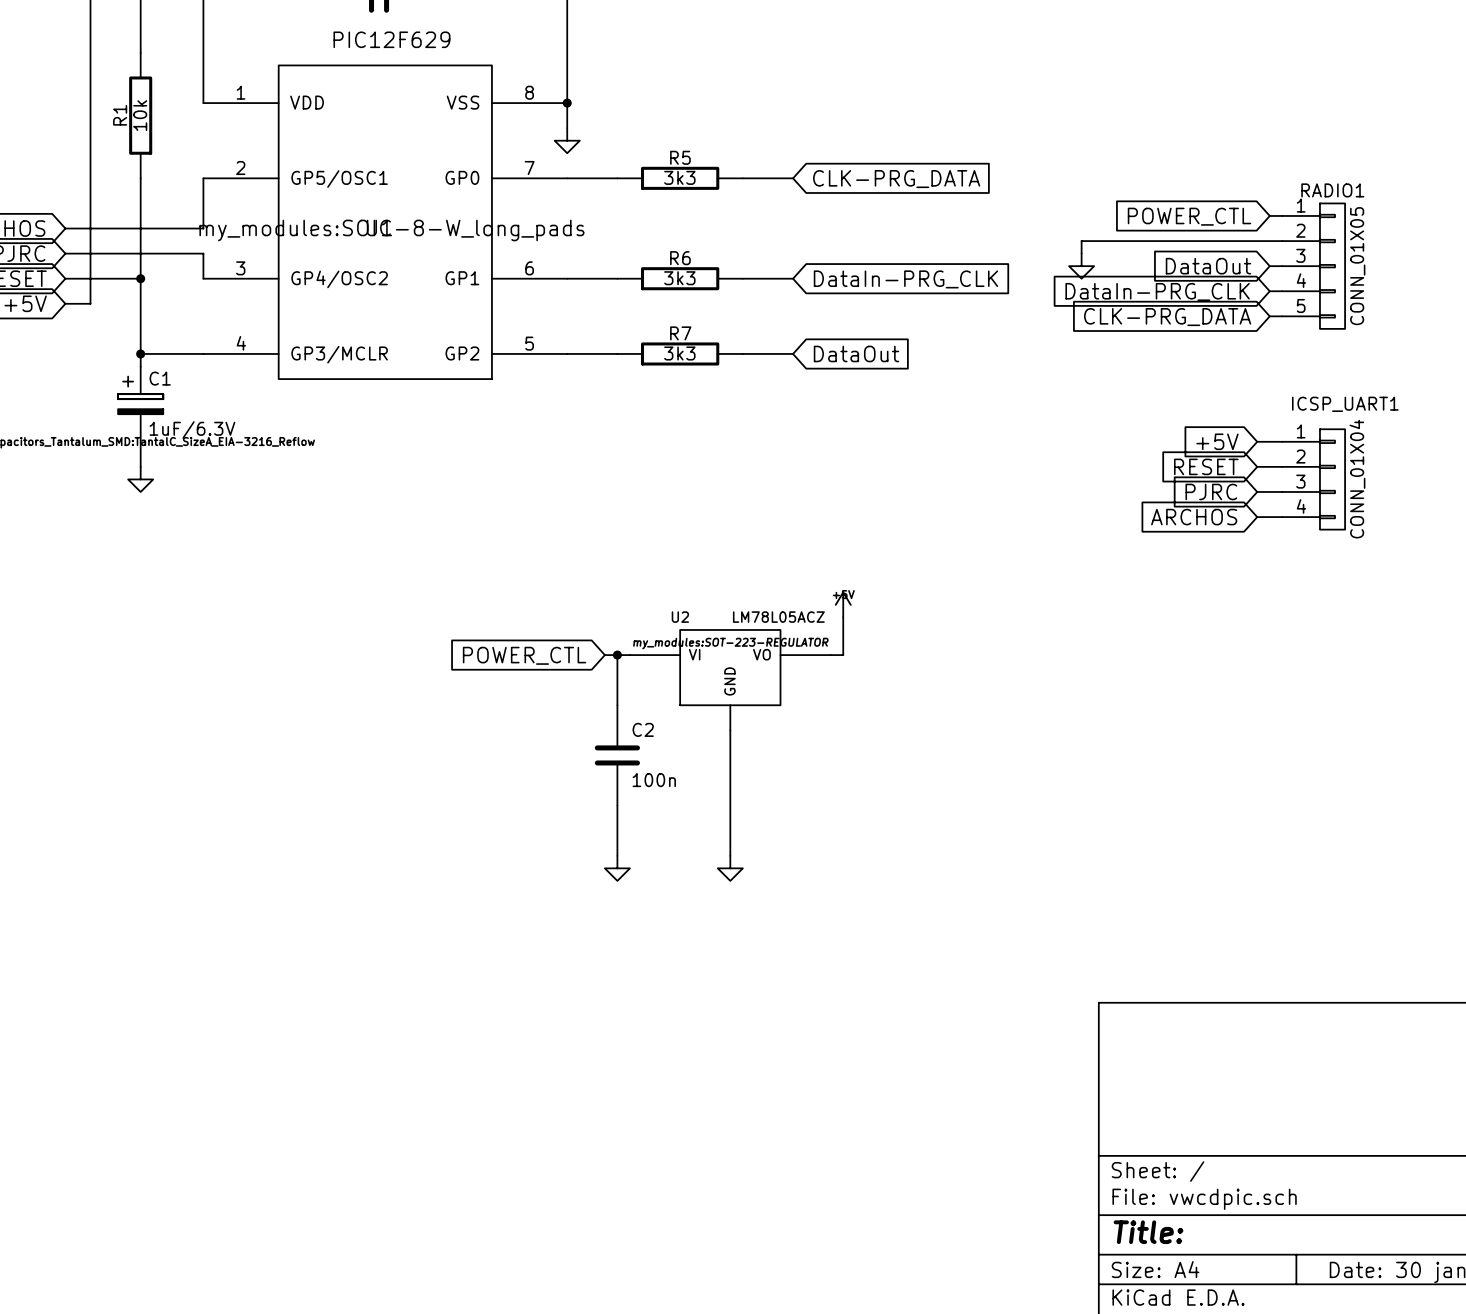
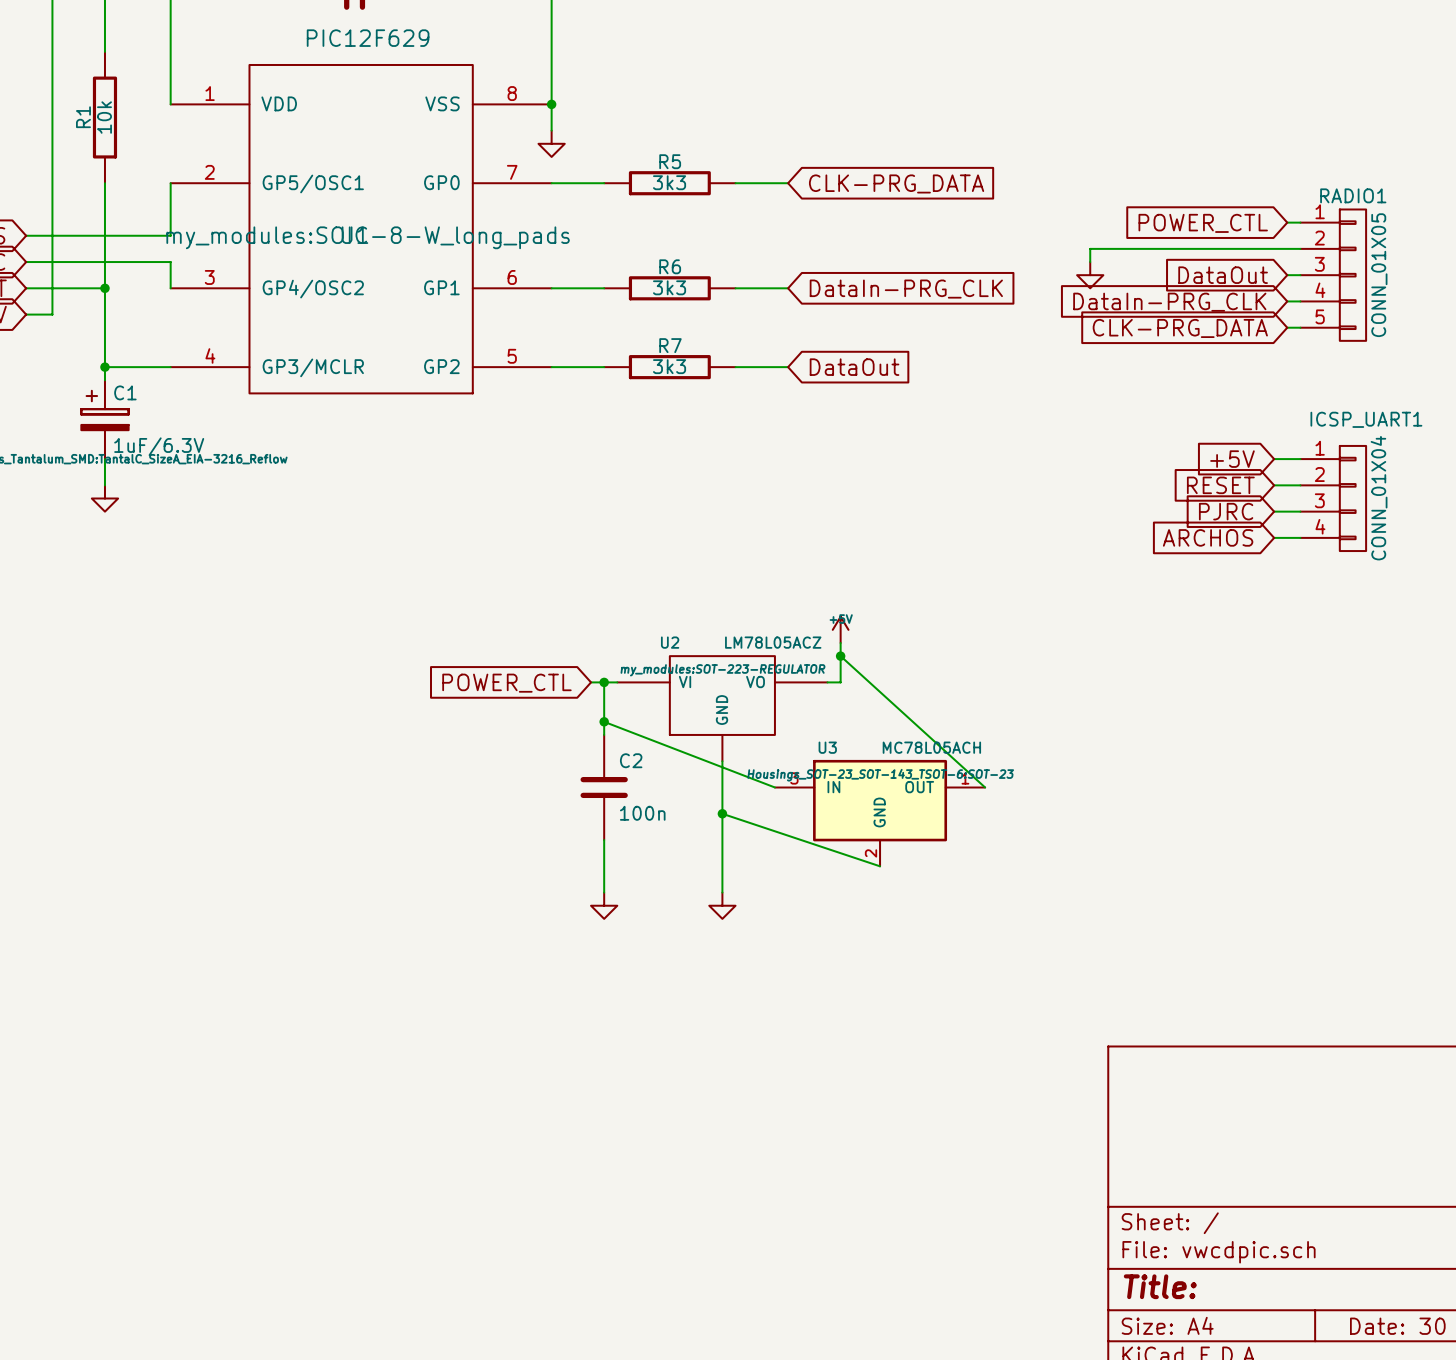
wire: none -> (840, 656) (985, 787)
junction: none -> (840, 656)
wire: none -> (604, 721) (774, 787)
junction: none -> (604, 721)
U3: none -> MC78L05ACH (880, 813)
wire: none -> (722, 813) (880, 866)
junction: none -> (722, 813)

